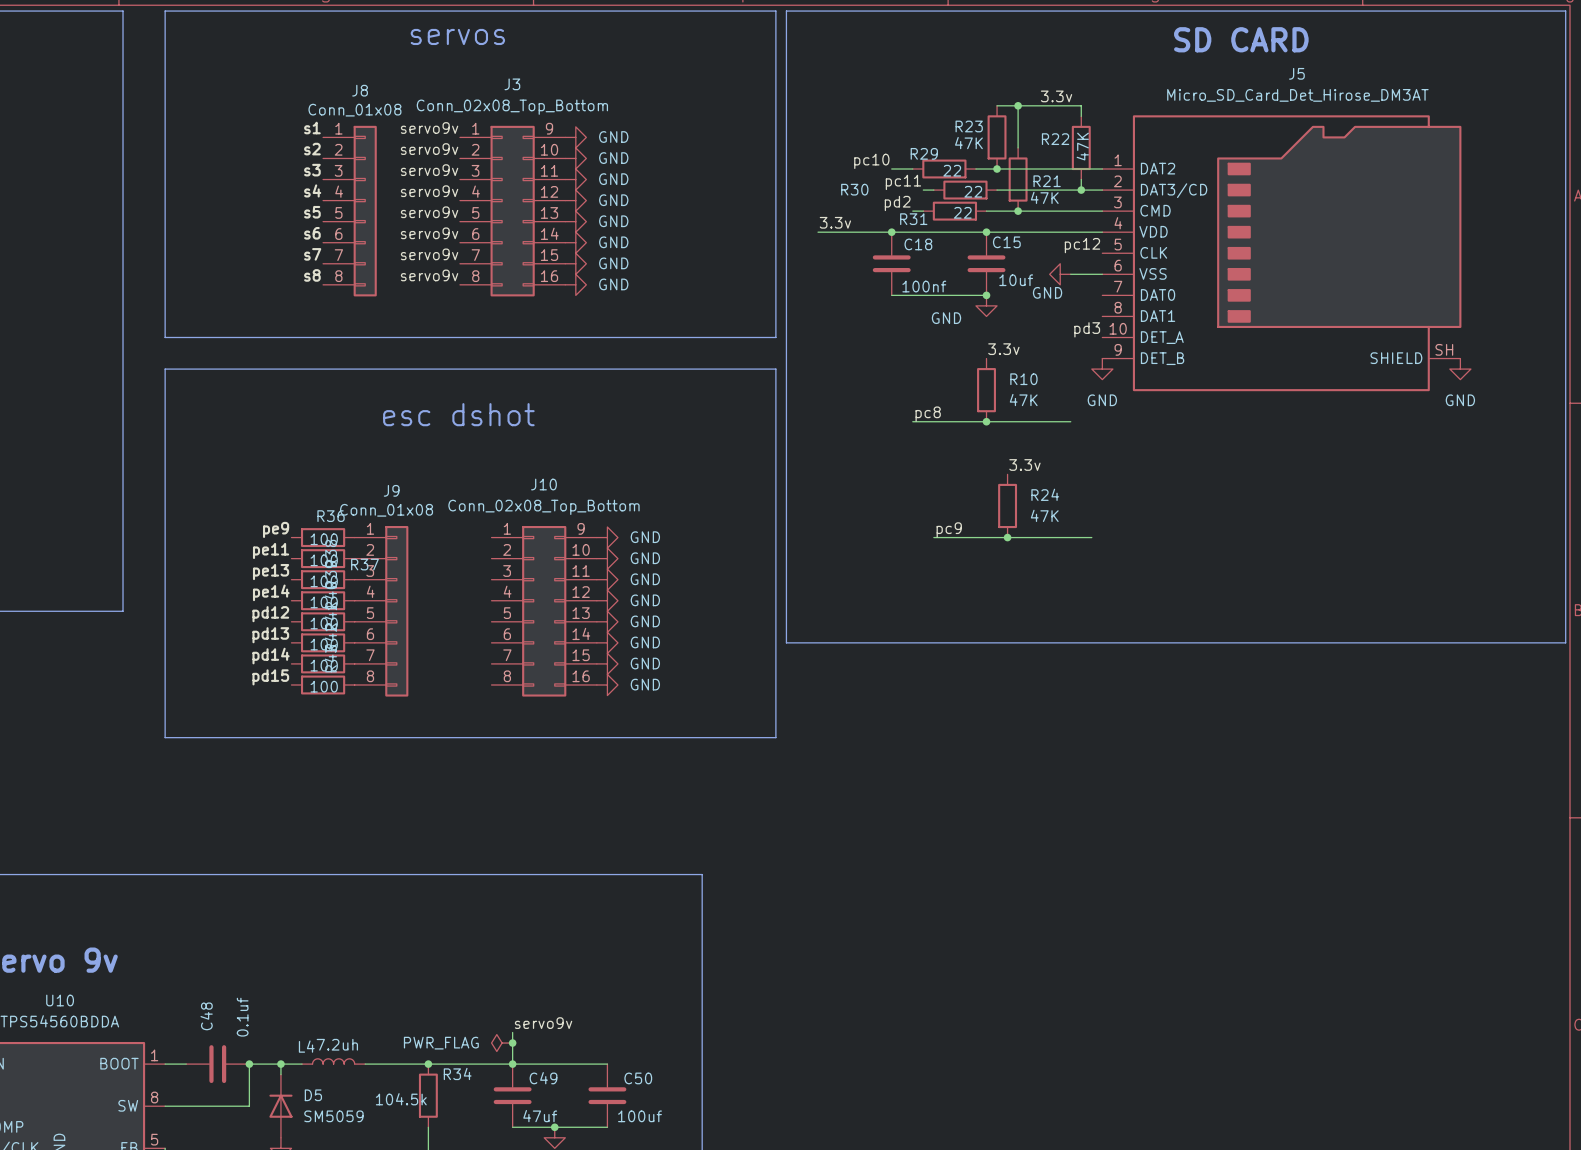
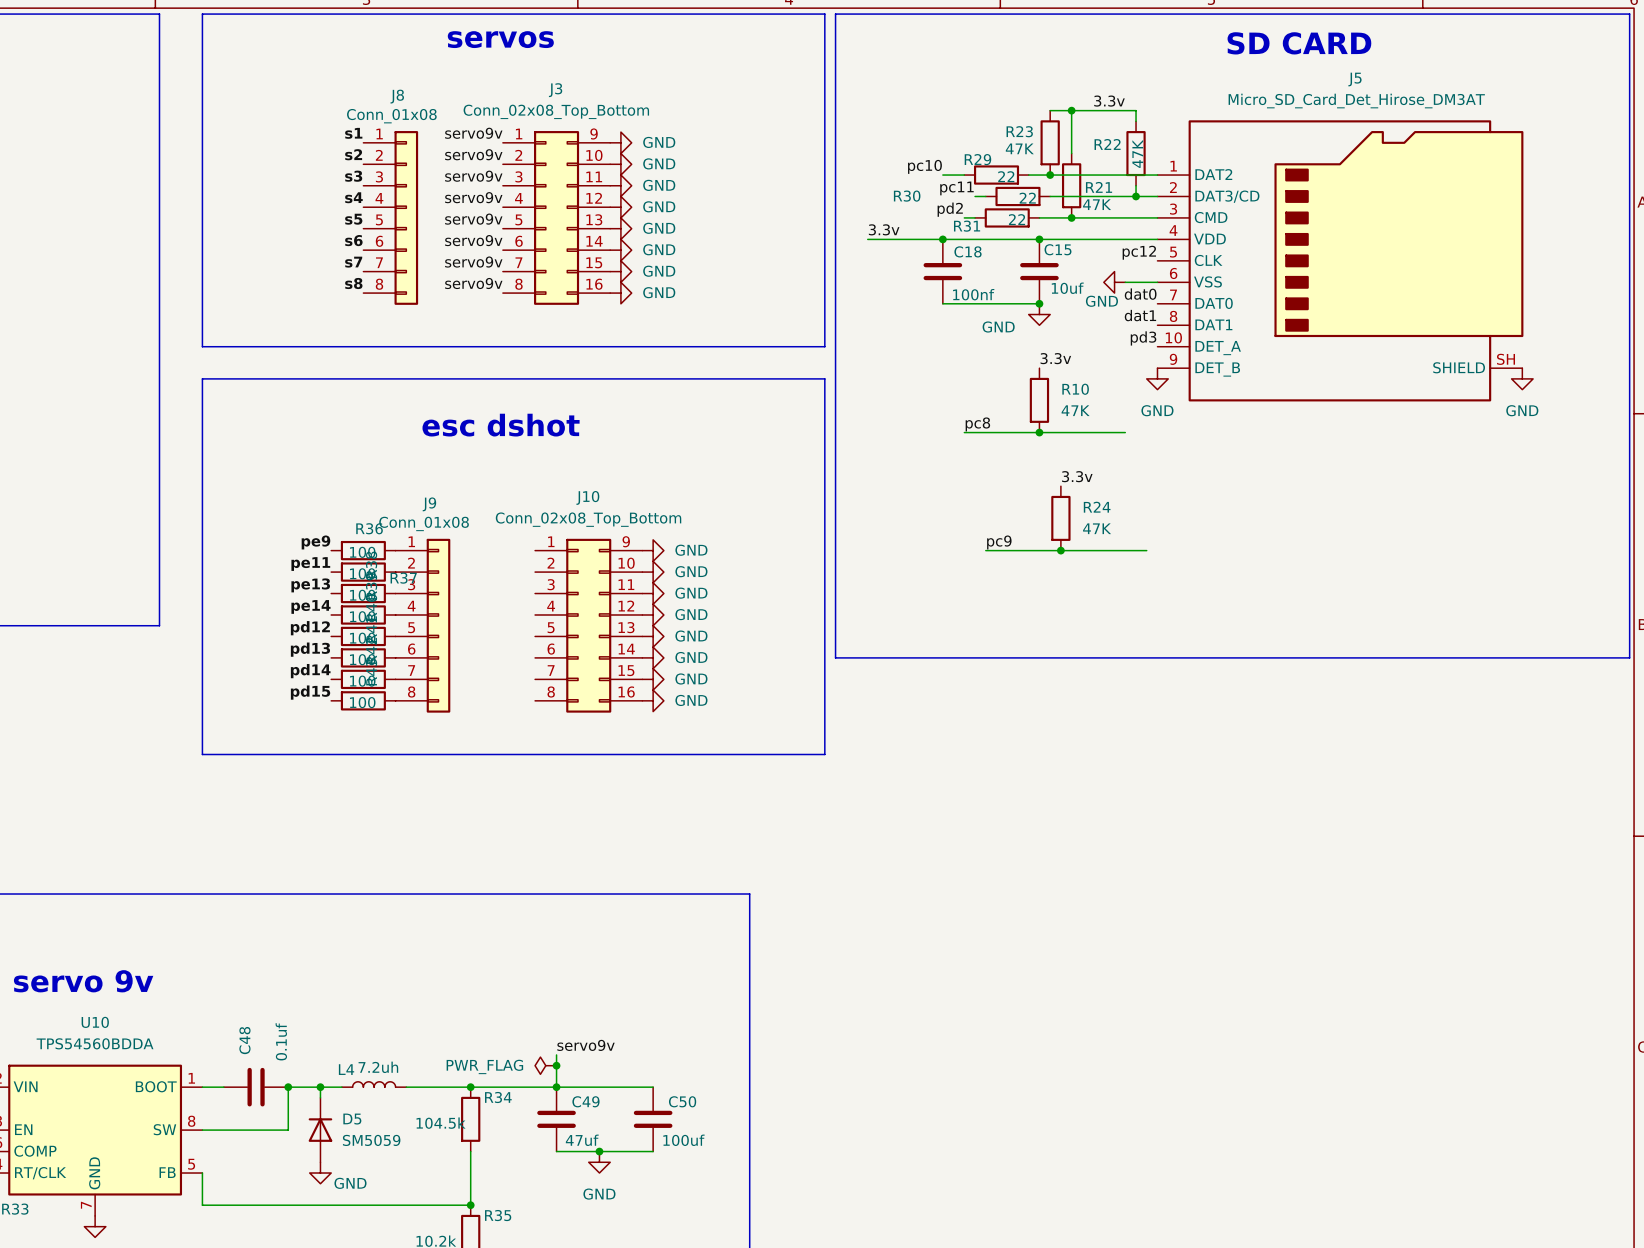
label: none -> dat0 (1140, 294)
label: none -> dat1 (1140, 315)

